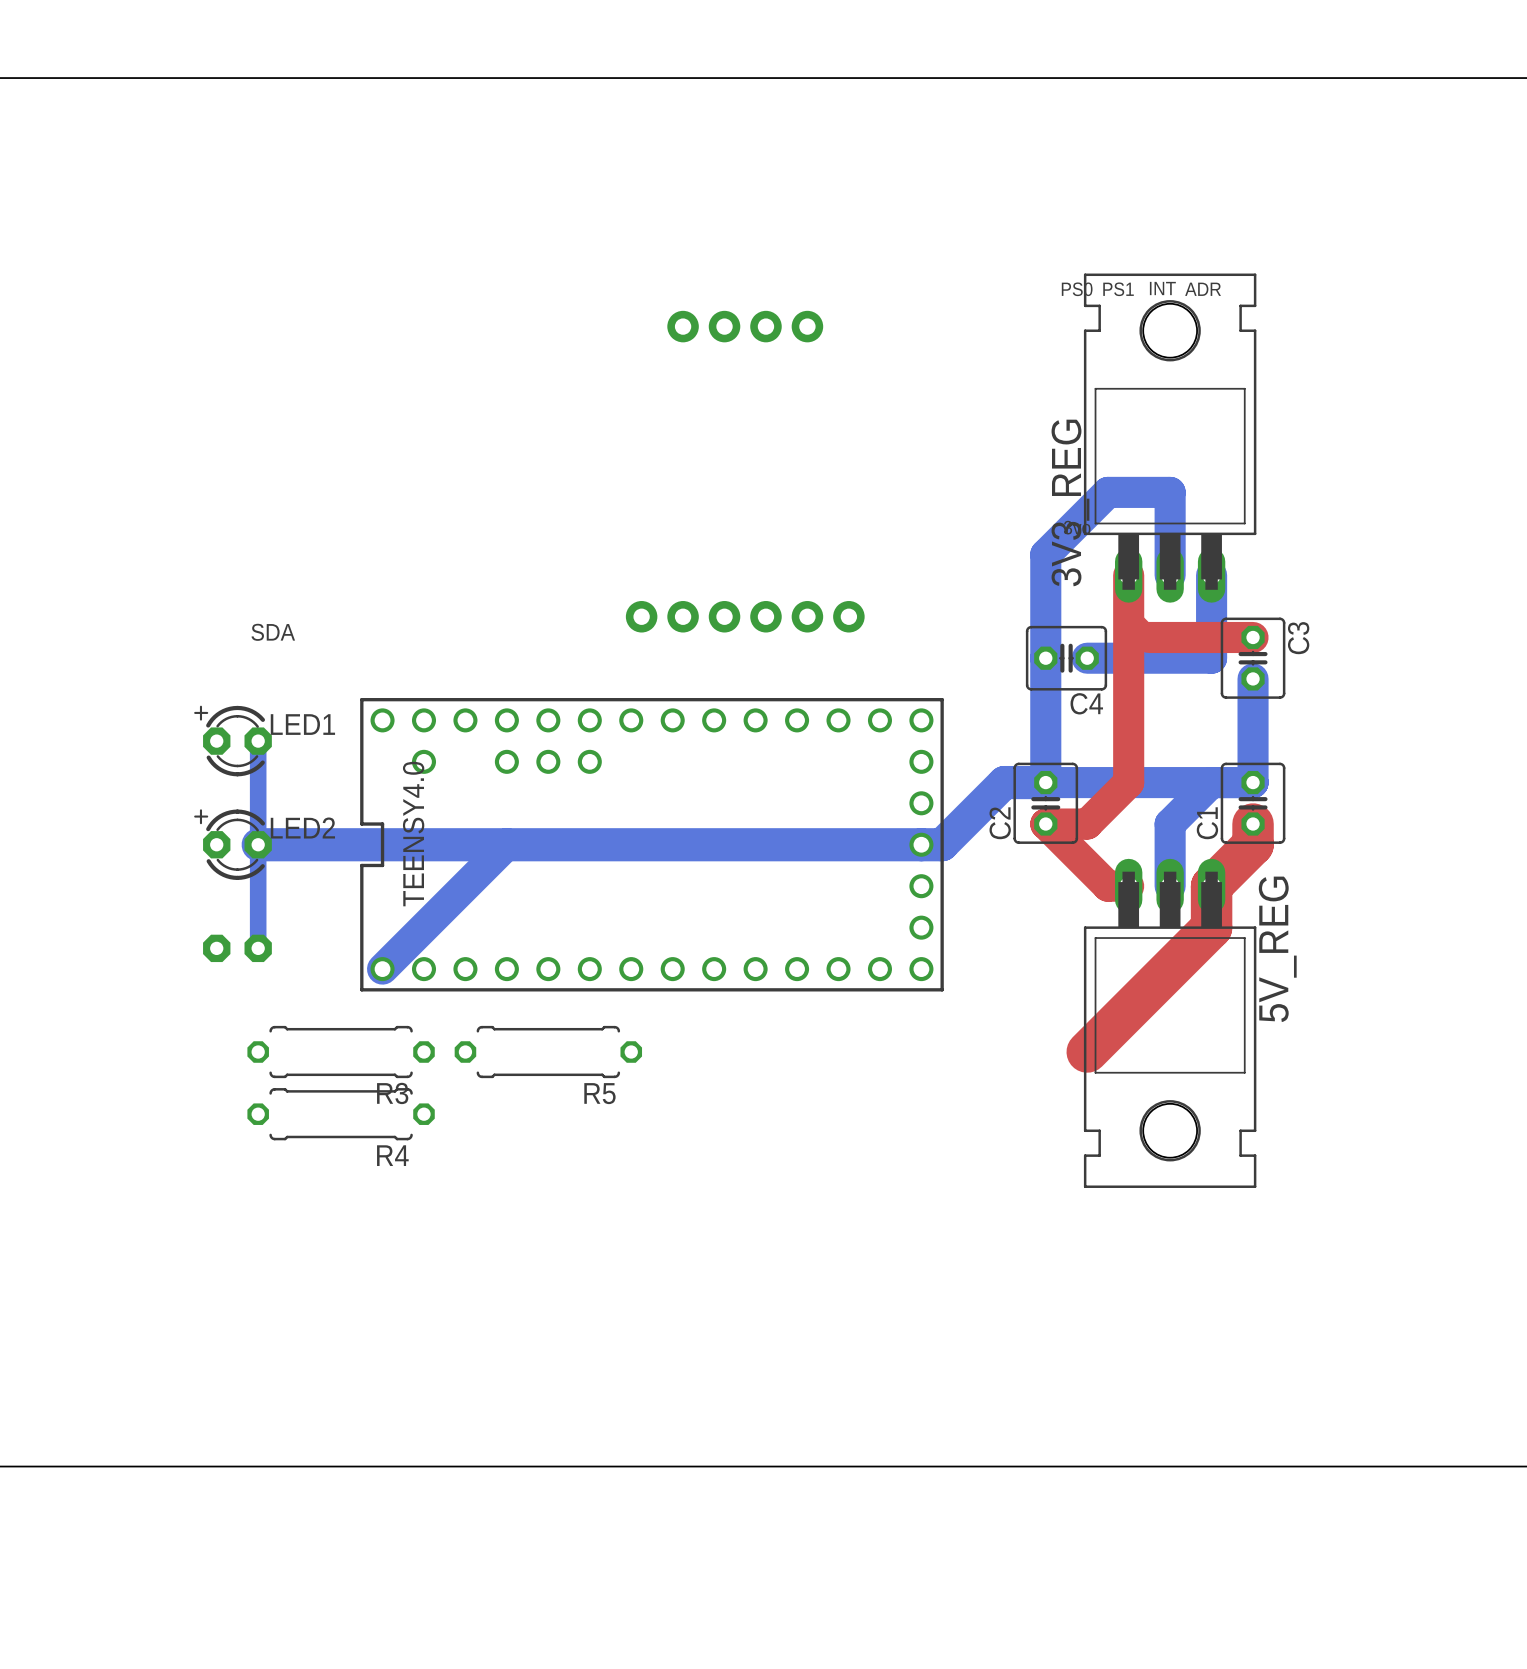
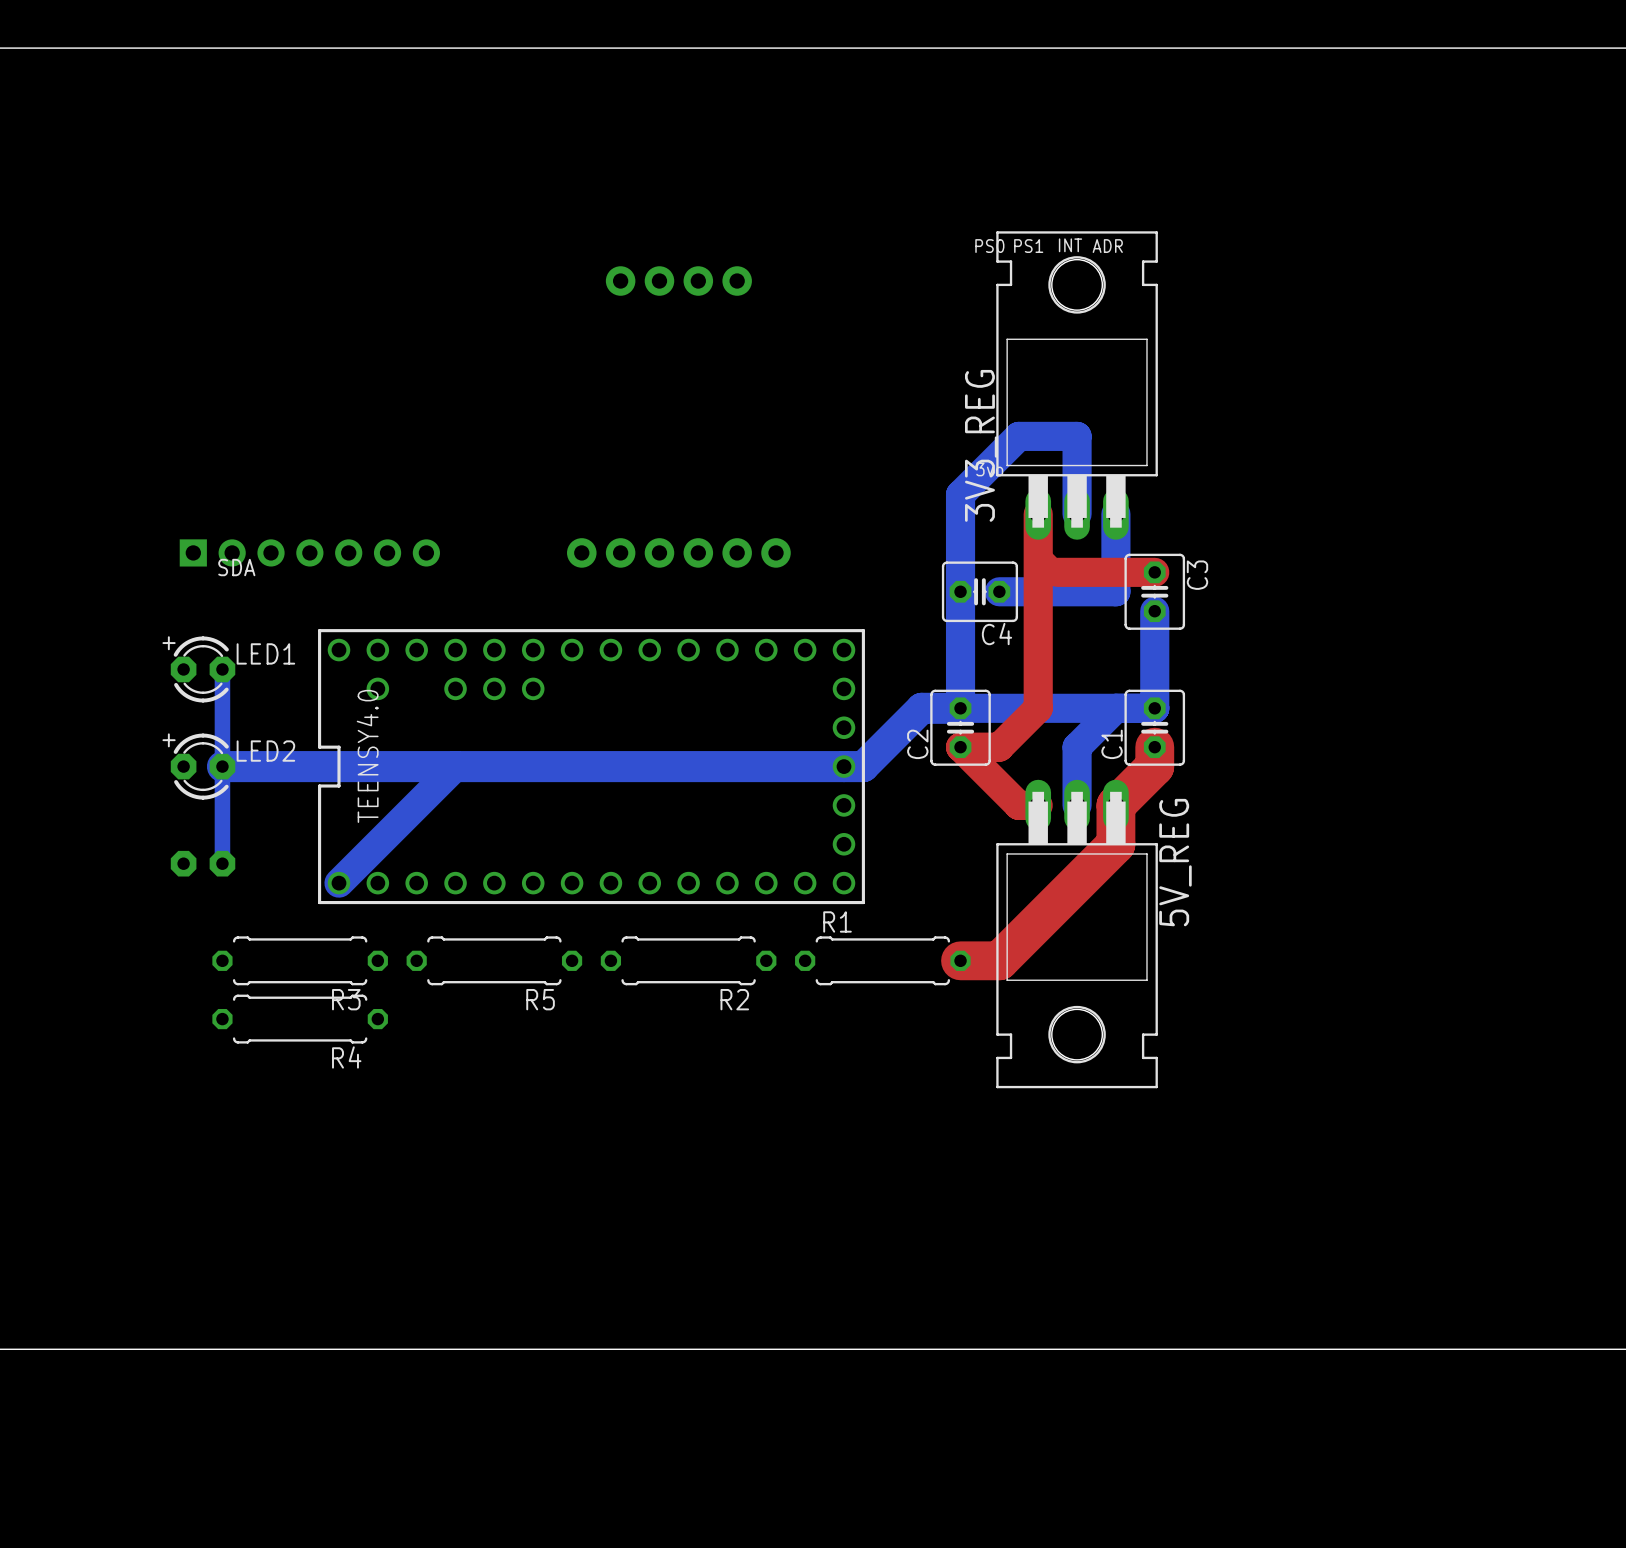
part: none -> (309, 552)
R2: none -> (688, 960)
R1: none -> (882, 960)
top track: none -> (960, 960) (999, 960)

